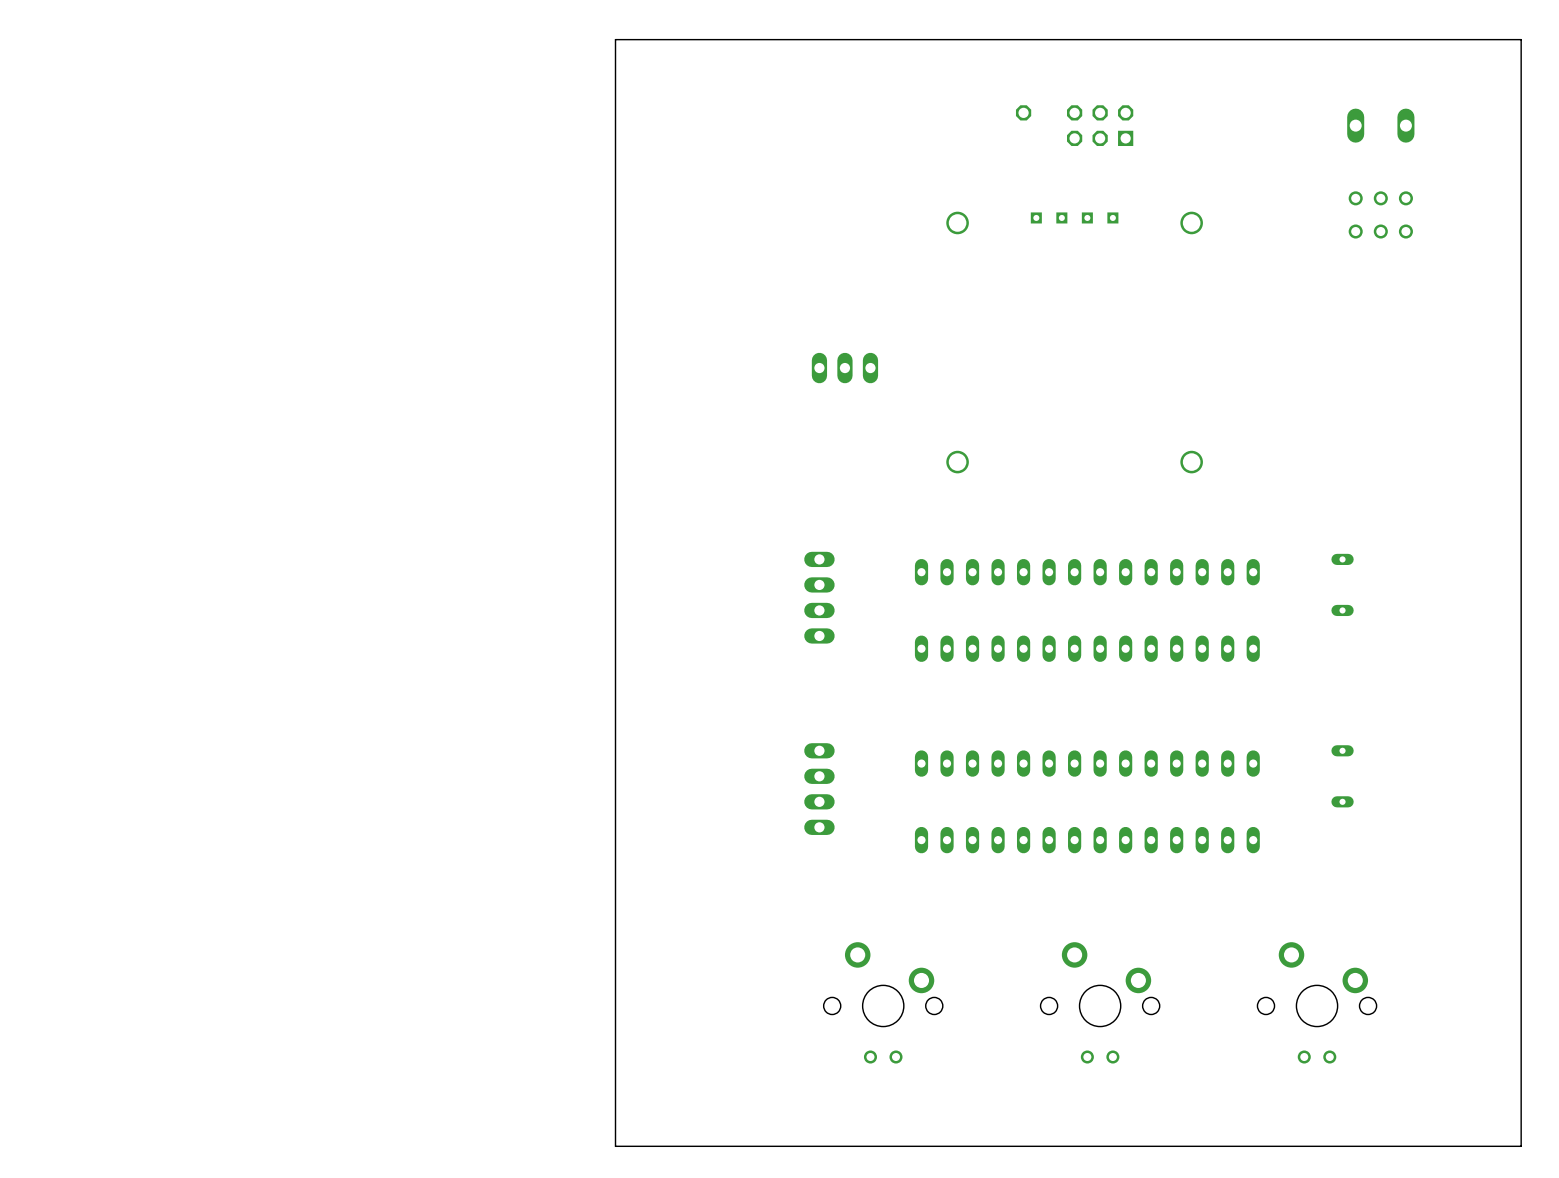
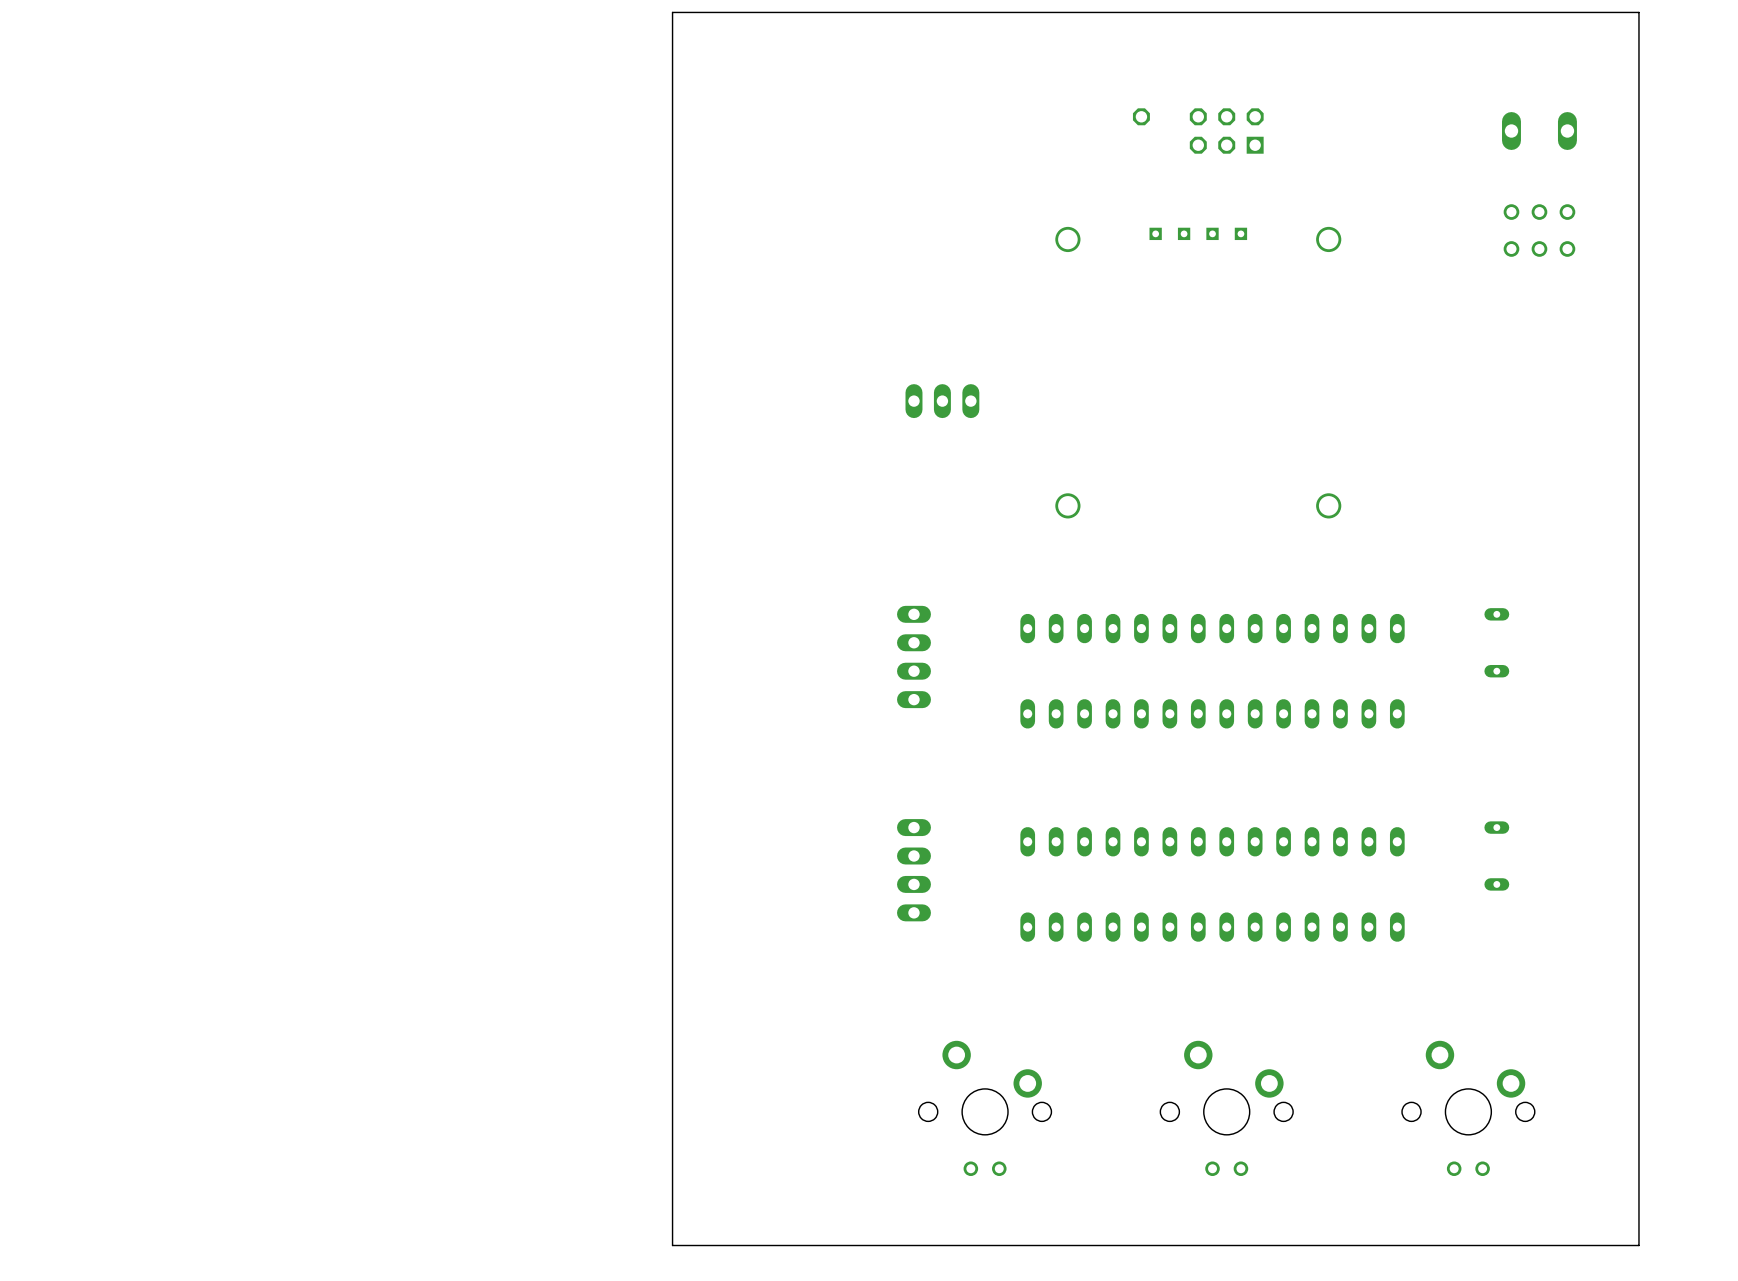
board edge: (1521, 39) (615, 39) (615, 1146) (1521, 1146) (1521, 39) -> (1638, 12) (1638, 1245) (672, 1245) (672, 12) (1638, 12)

